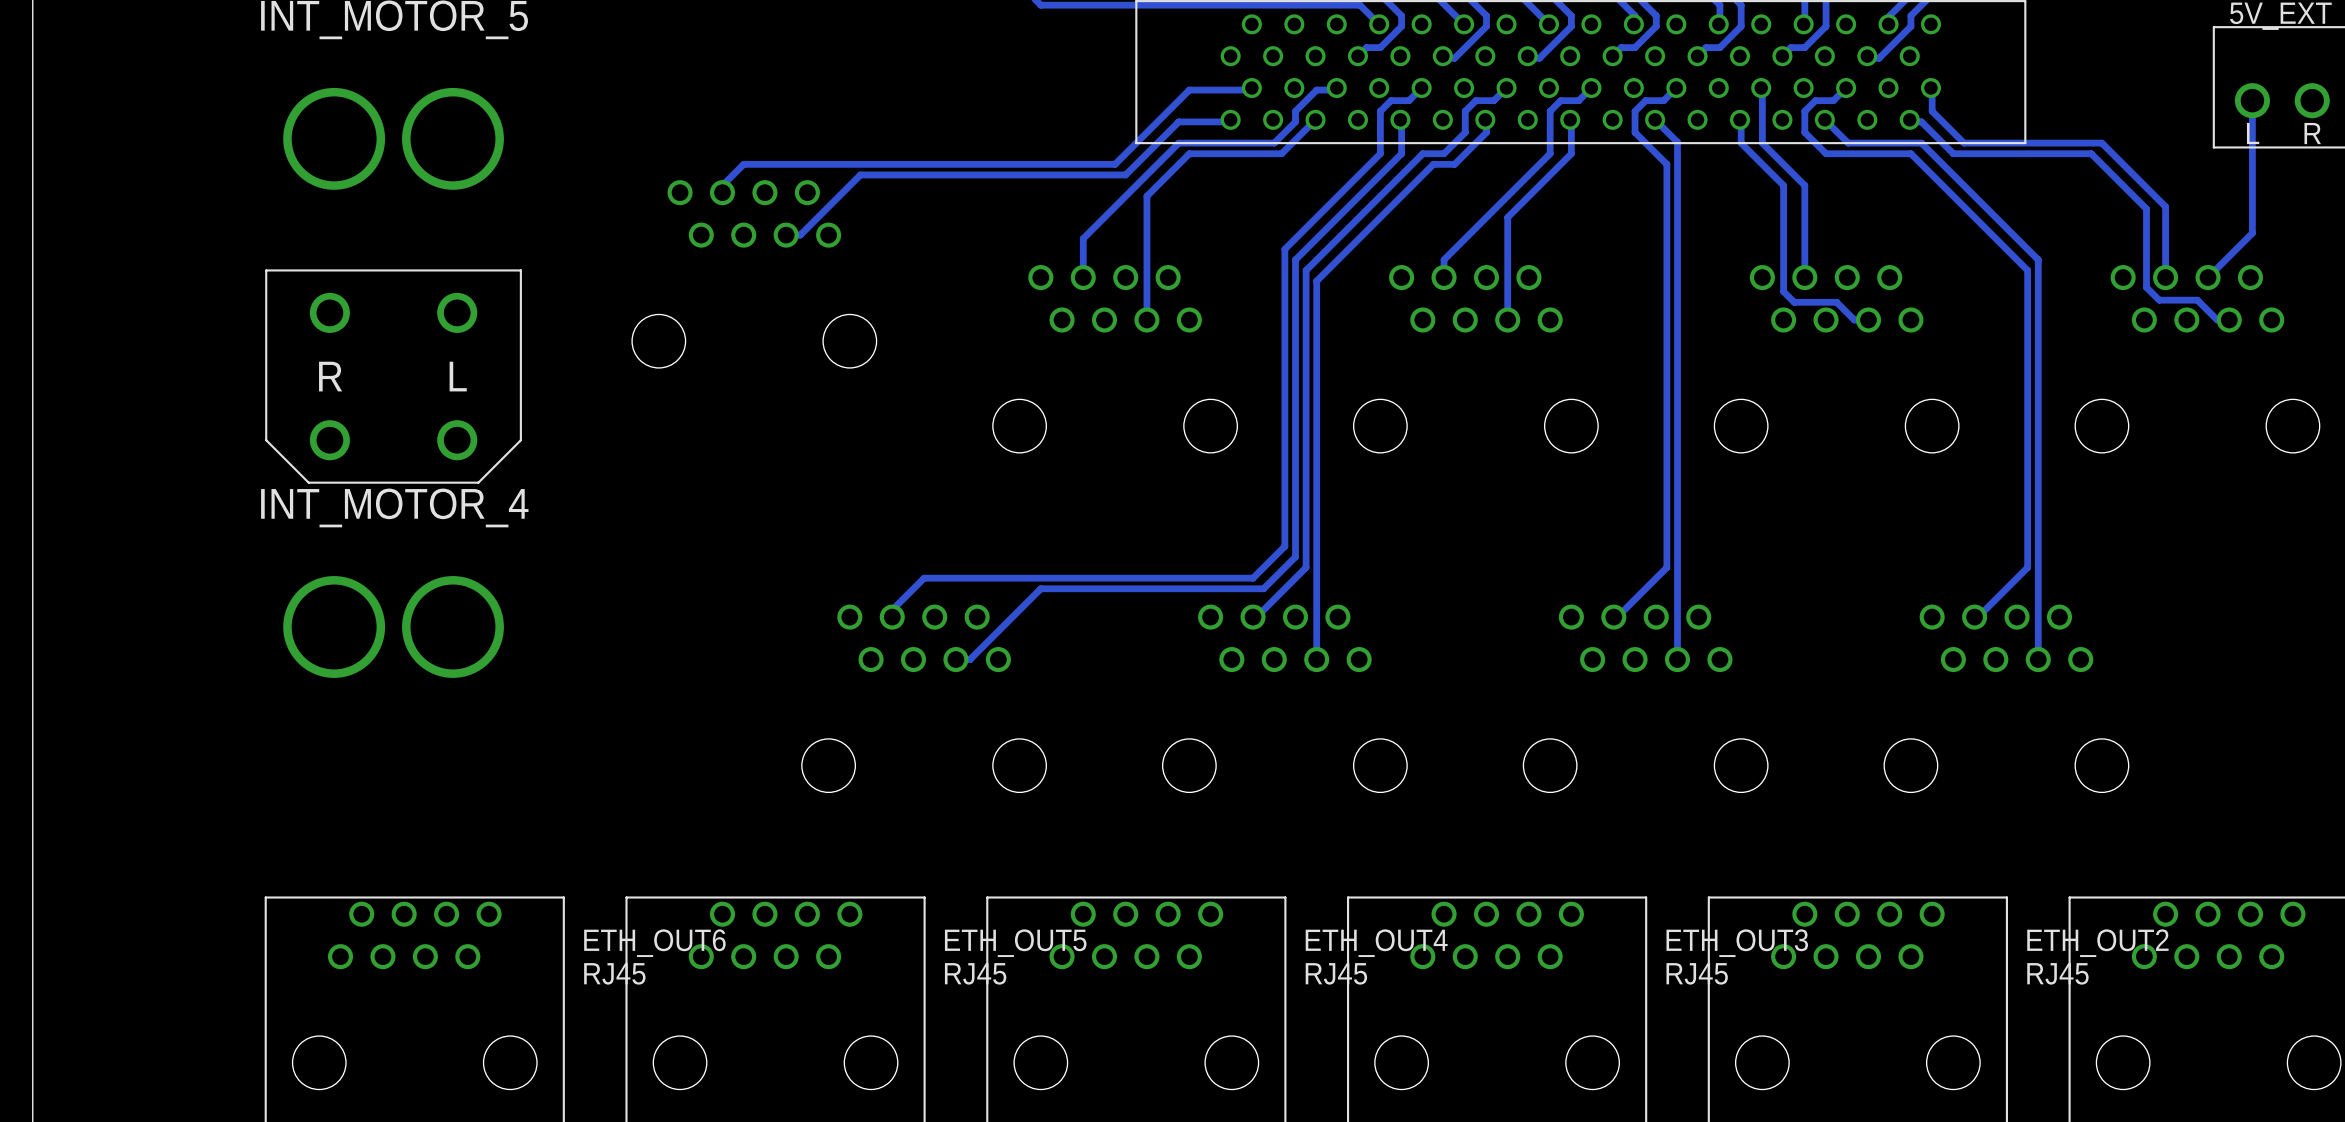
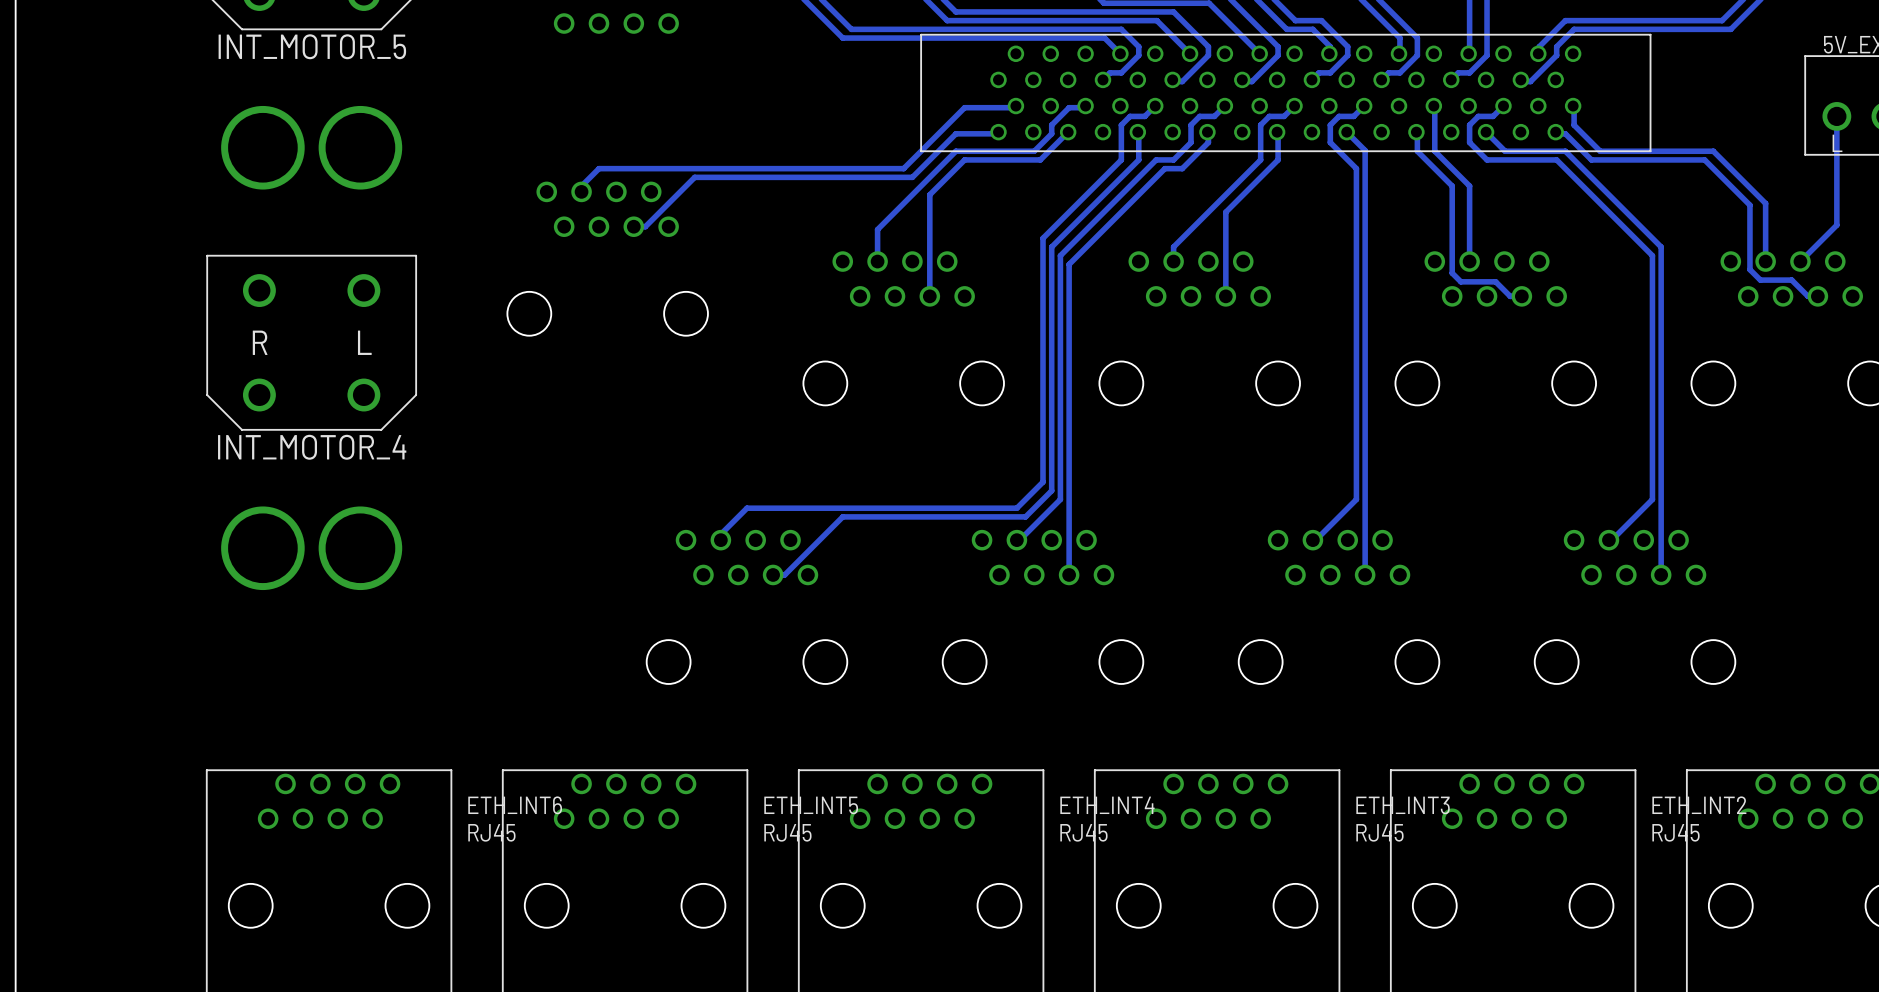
ETH_OUT6 name: ETH_OUT6 (654, 943) -> ETH_INT6 (515, 805)
ETH_OUT5 name: ETH_OUT5 (1015, 943) -> ETH_INT5 (811, 805)
ETH_OUT4 name: ETH_OUT4 (1376, 943) -> ETH_INT4 (1107, 805)
ETH_OUT3 name: ETH_OUT3 (1737, 943) -> ETH_INT3 (1403, 805)
ETH_OUT2 name: ETH_OUT2 (2097, 943) -> ETH_INT2 (1699, 805)

